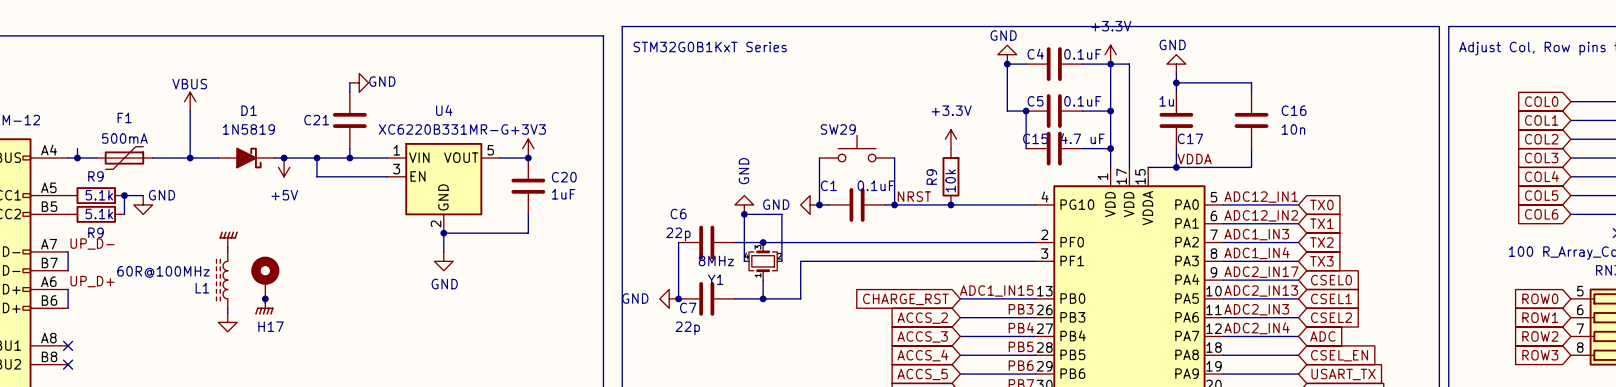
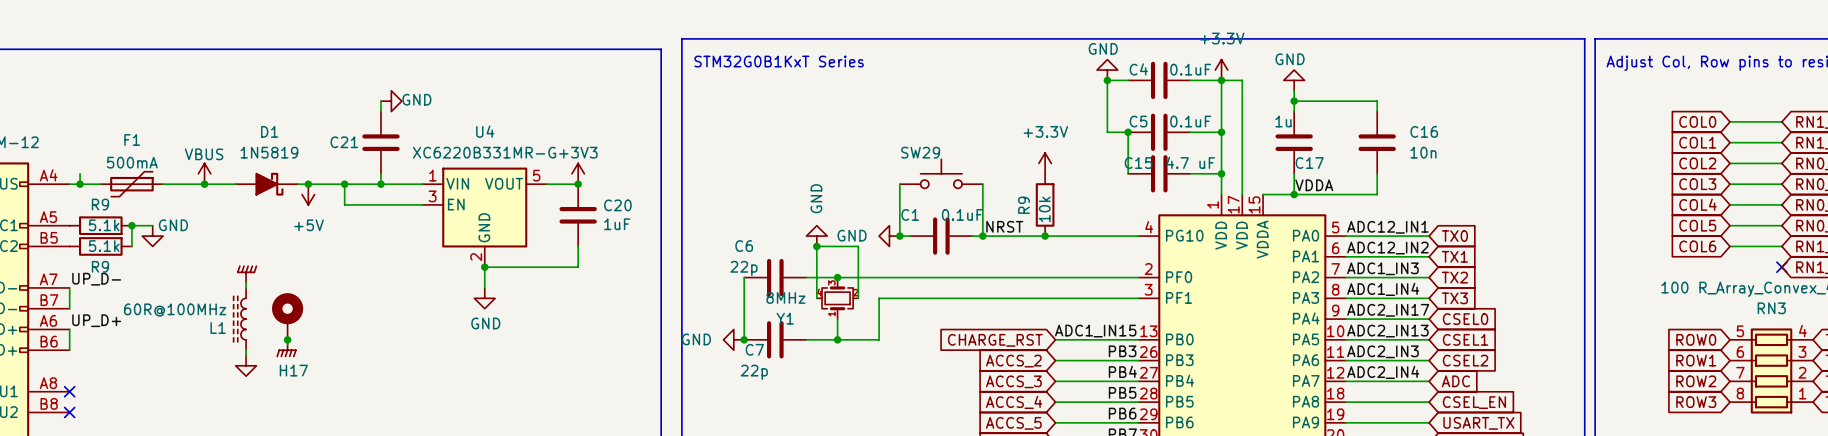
power symbol position: VBUS (190, 101) -> VBUS (204, 173)
wire: (190, 111) (190, 158) -> none

